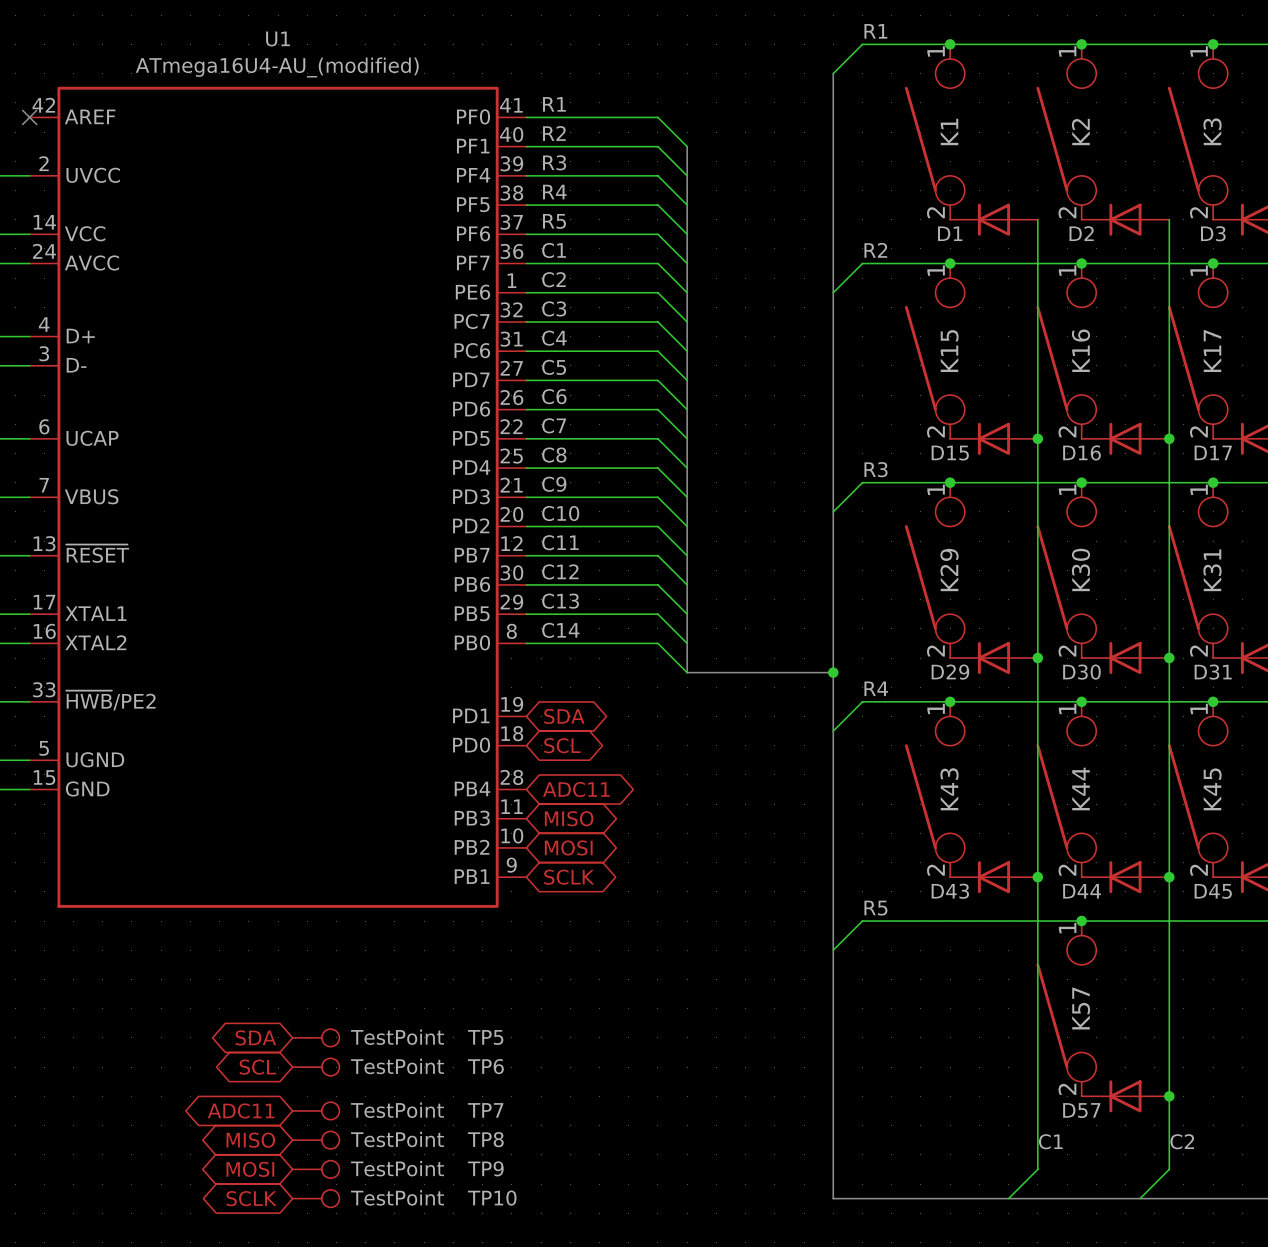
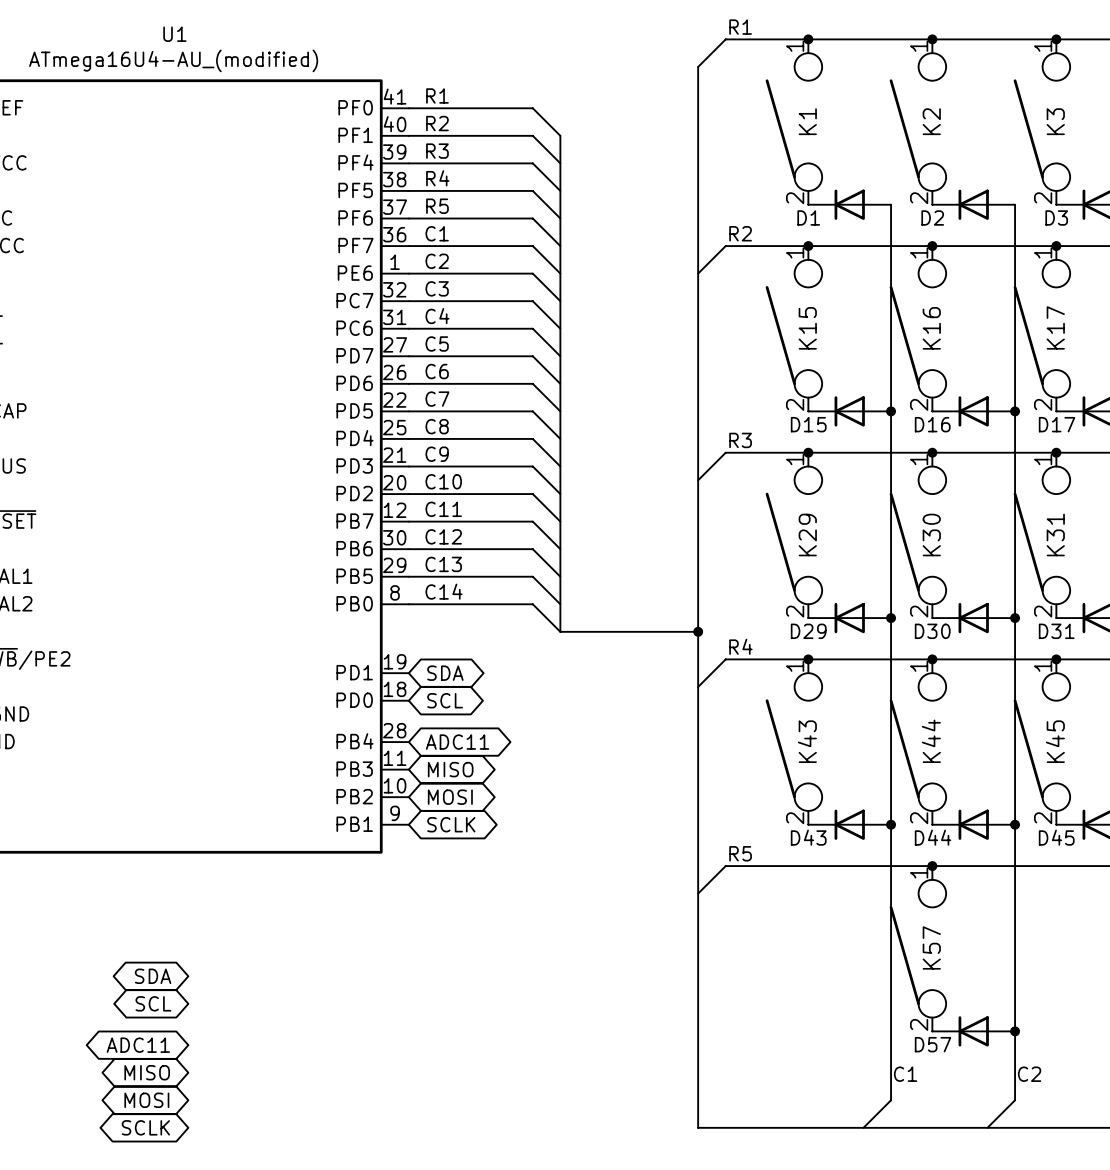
TP5: TestPoint (316, 1037) -> none
TP6: TestPoint (316, 1067) -> none
TP7: TestPoint (316, 1110) -> none
TP8: TestPoint (316, 1140) -> none
TP9: TestPoint (316, 1169) -> none
TP10: TestPoint (316, 1198) -> none

